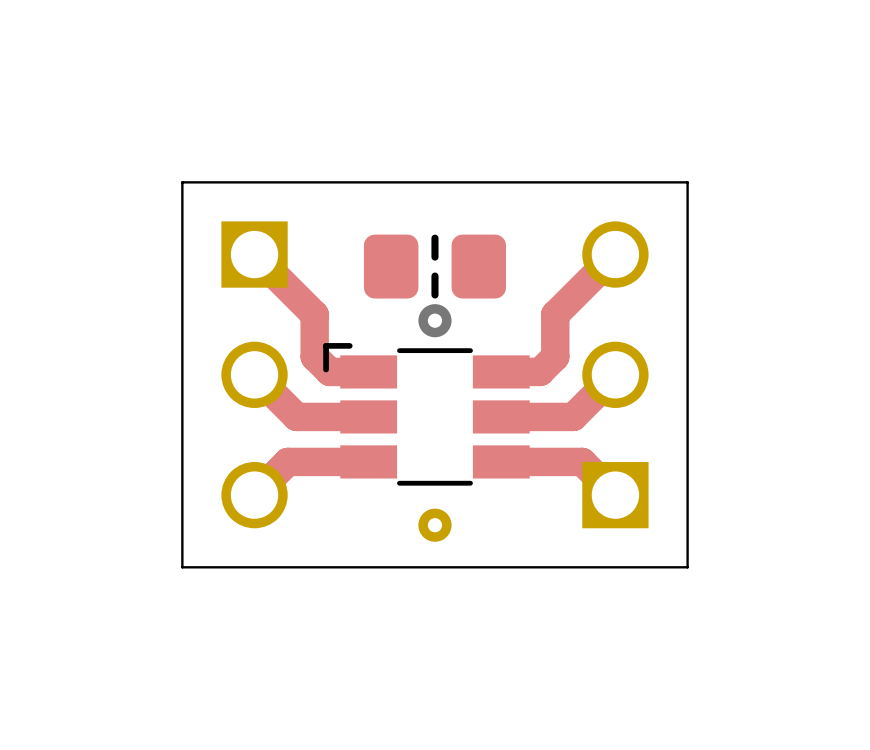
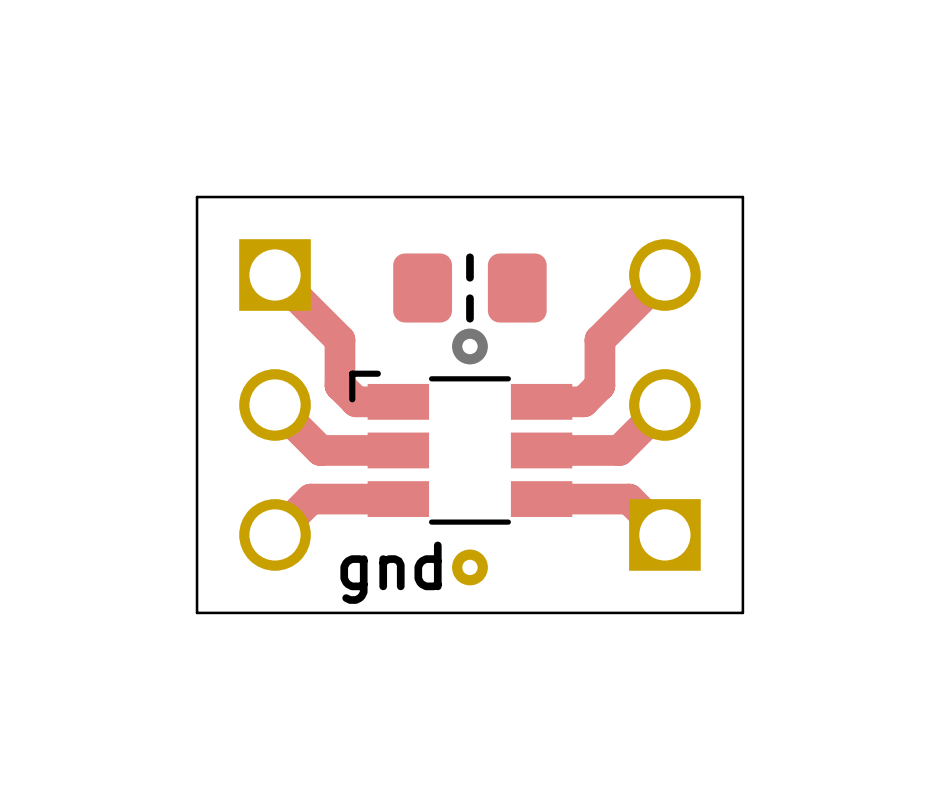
part value: none -> gnd (391, 572)

